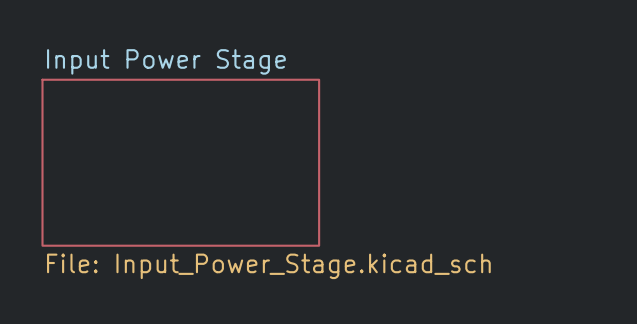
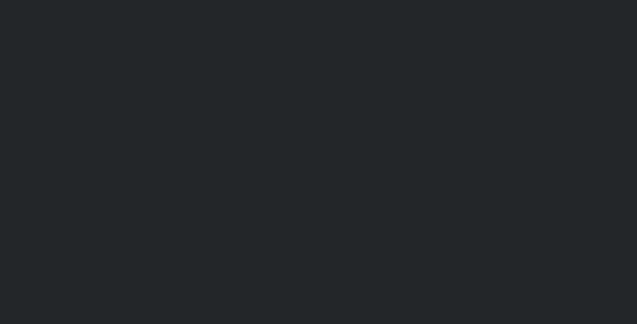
sheet Input Power Stage: File: Input_Power_Stage.kicad_sch (180, 162) -> none

